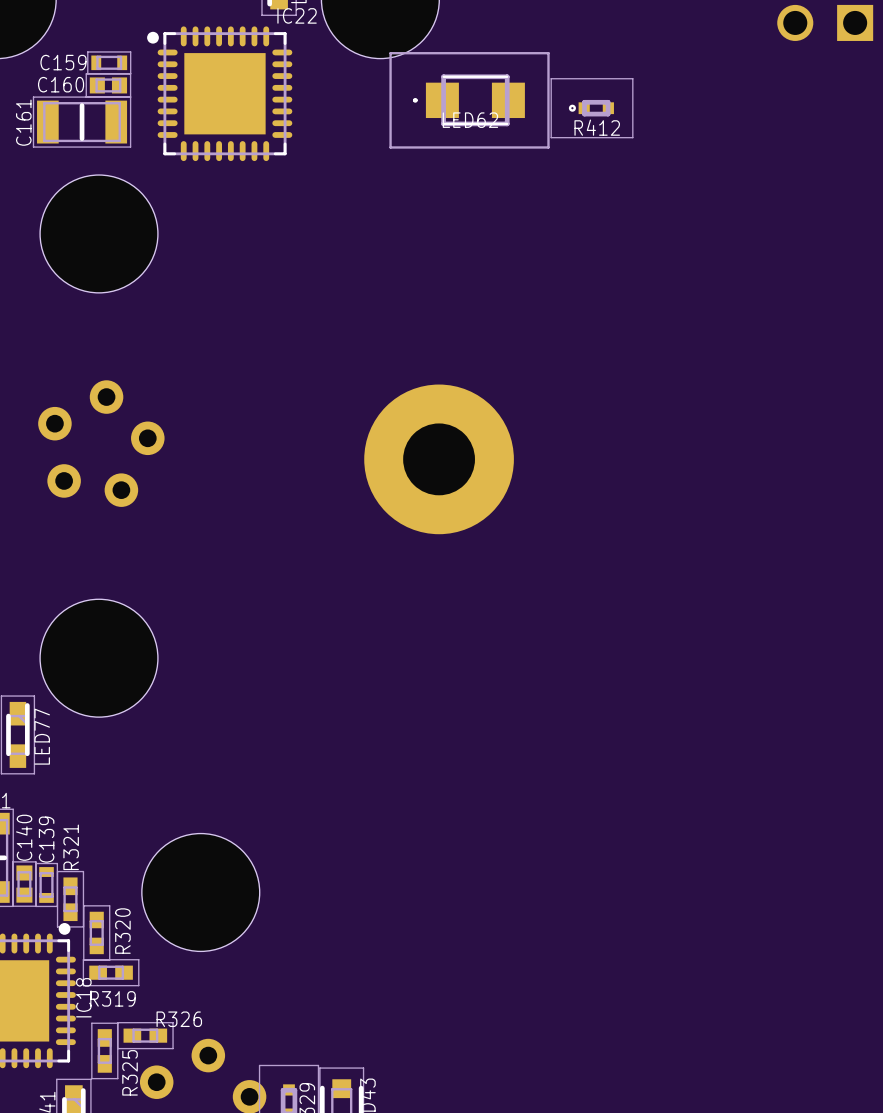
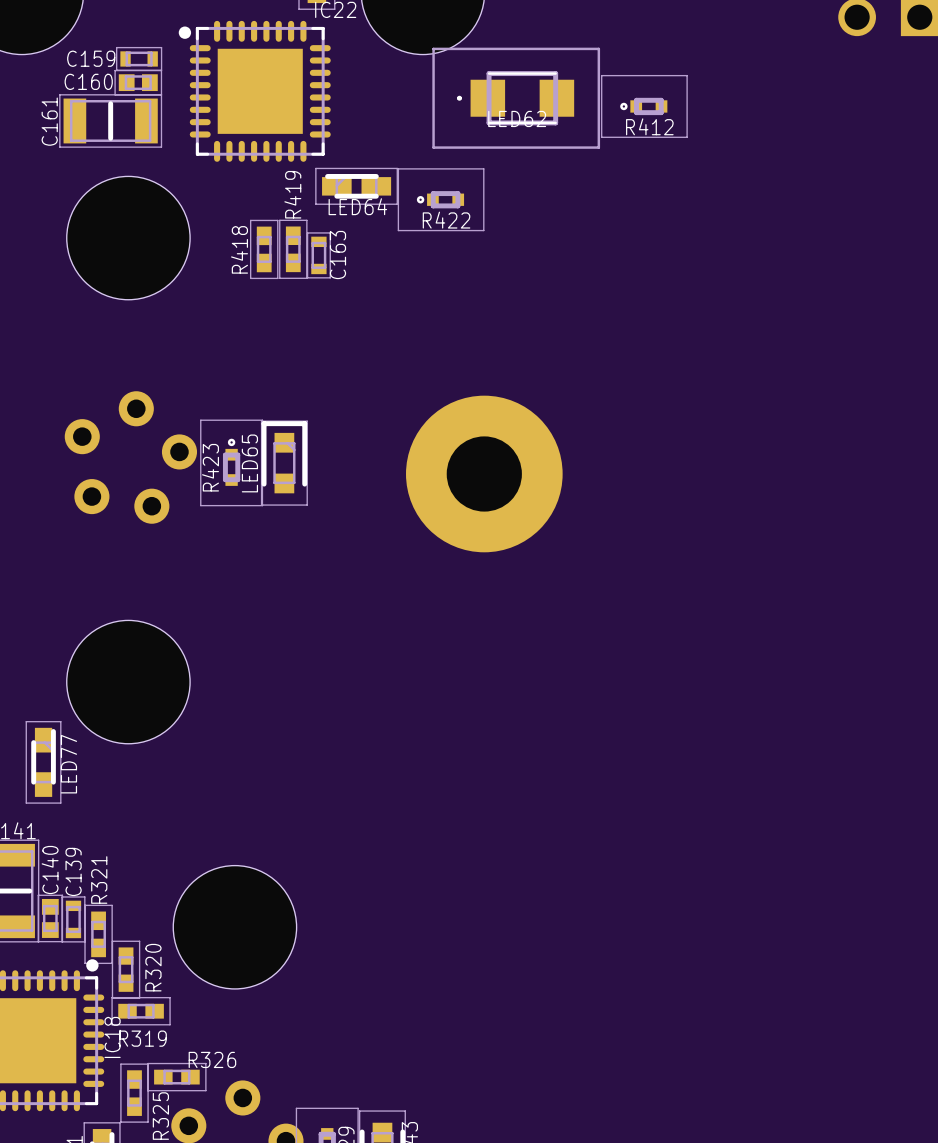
LED64: none -> (356, 186)
R422: none -> (441, 199)
R418: none -> (264, 249)
R419: none -> (293, 249)
C163: none -> (318, 255)
R423: none -> (231, 462)
LED65: none -> (284, 463)

